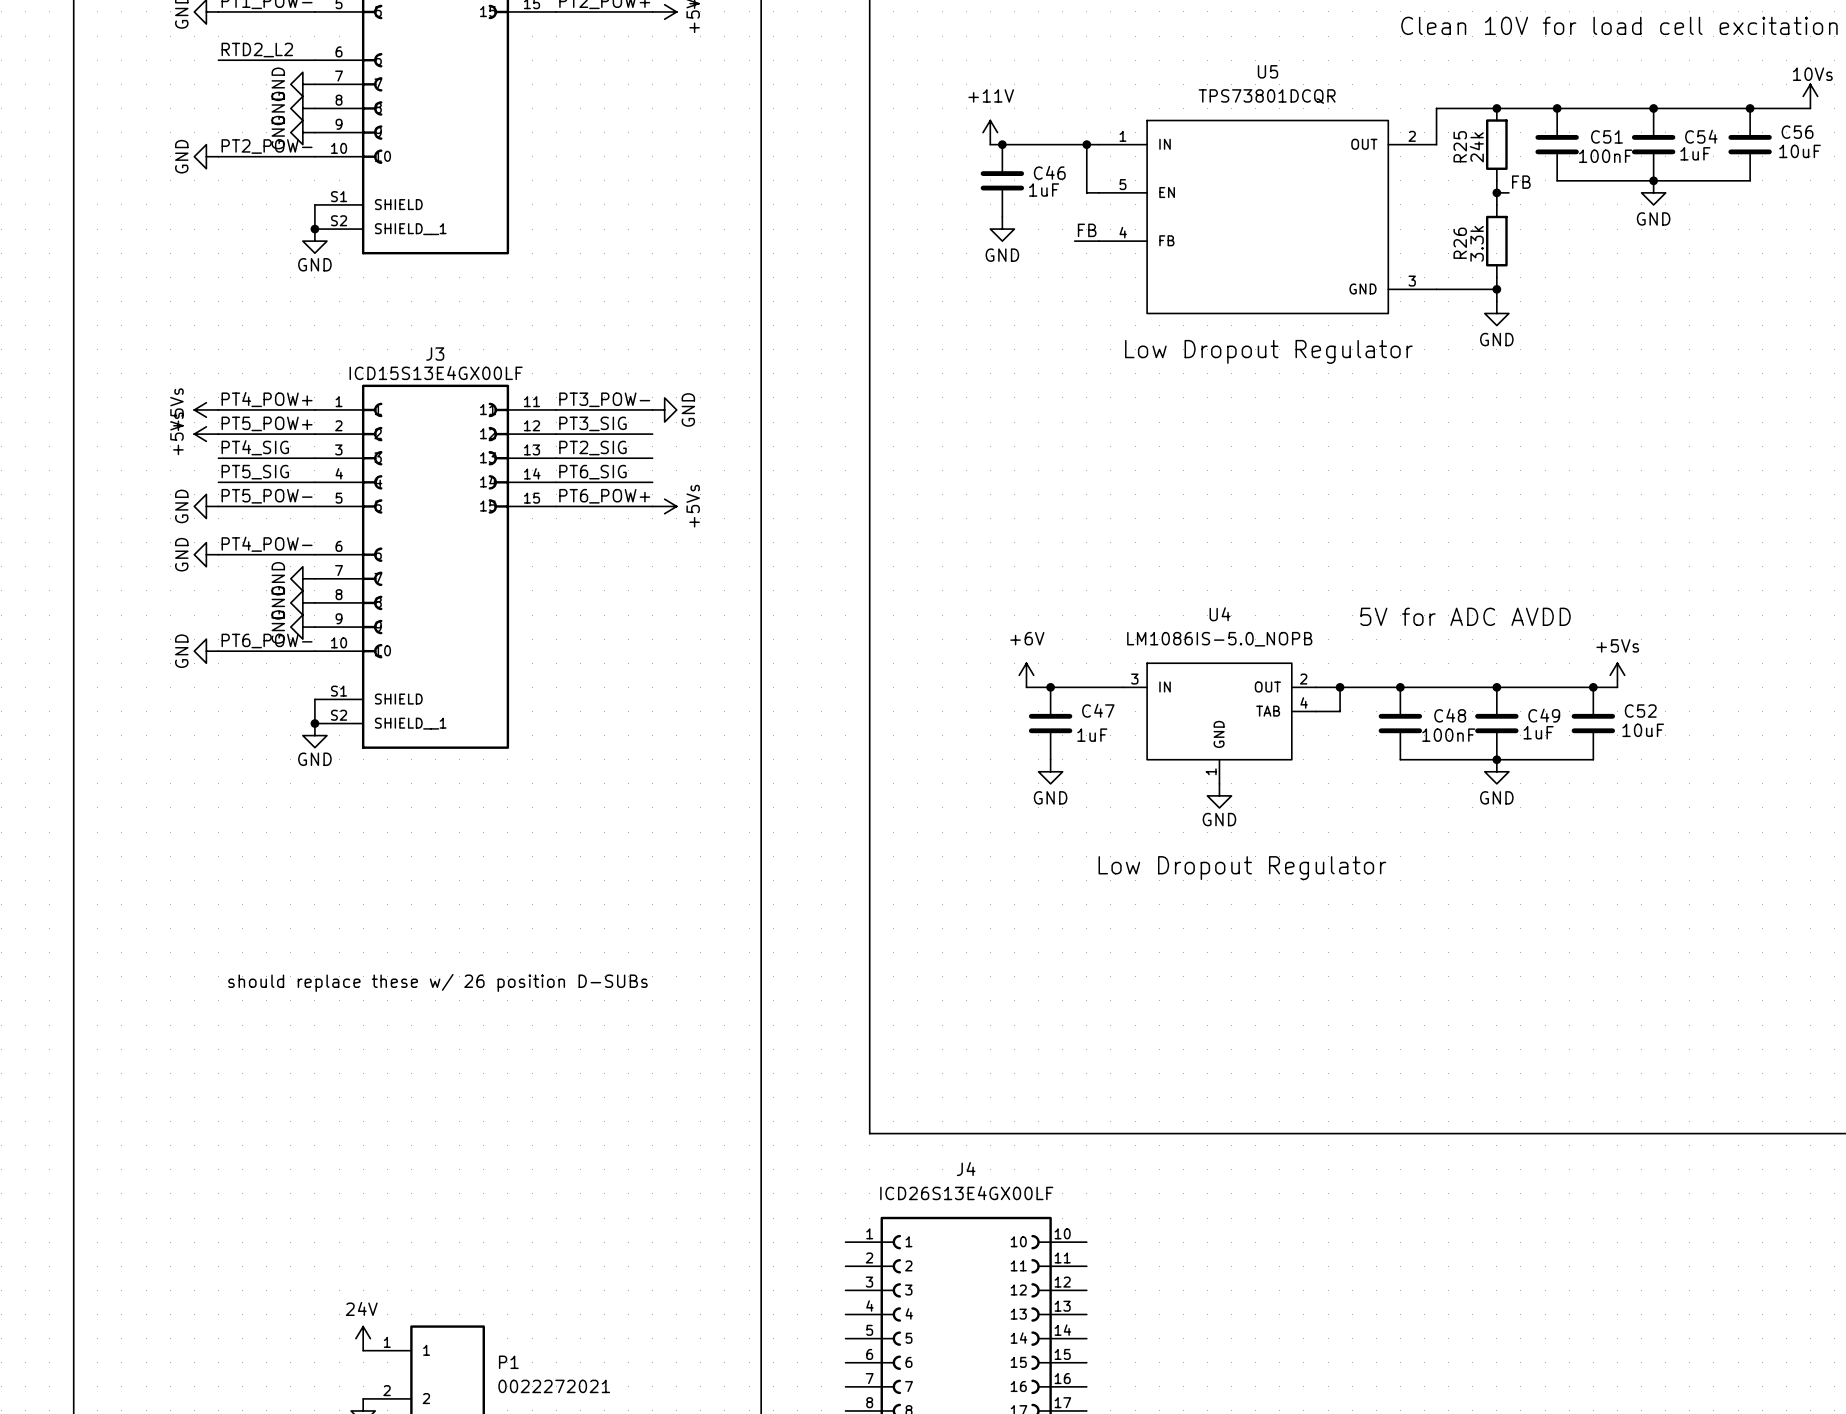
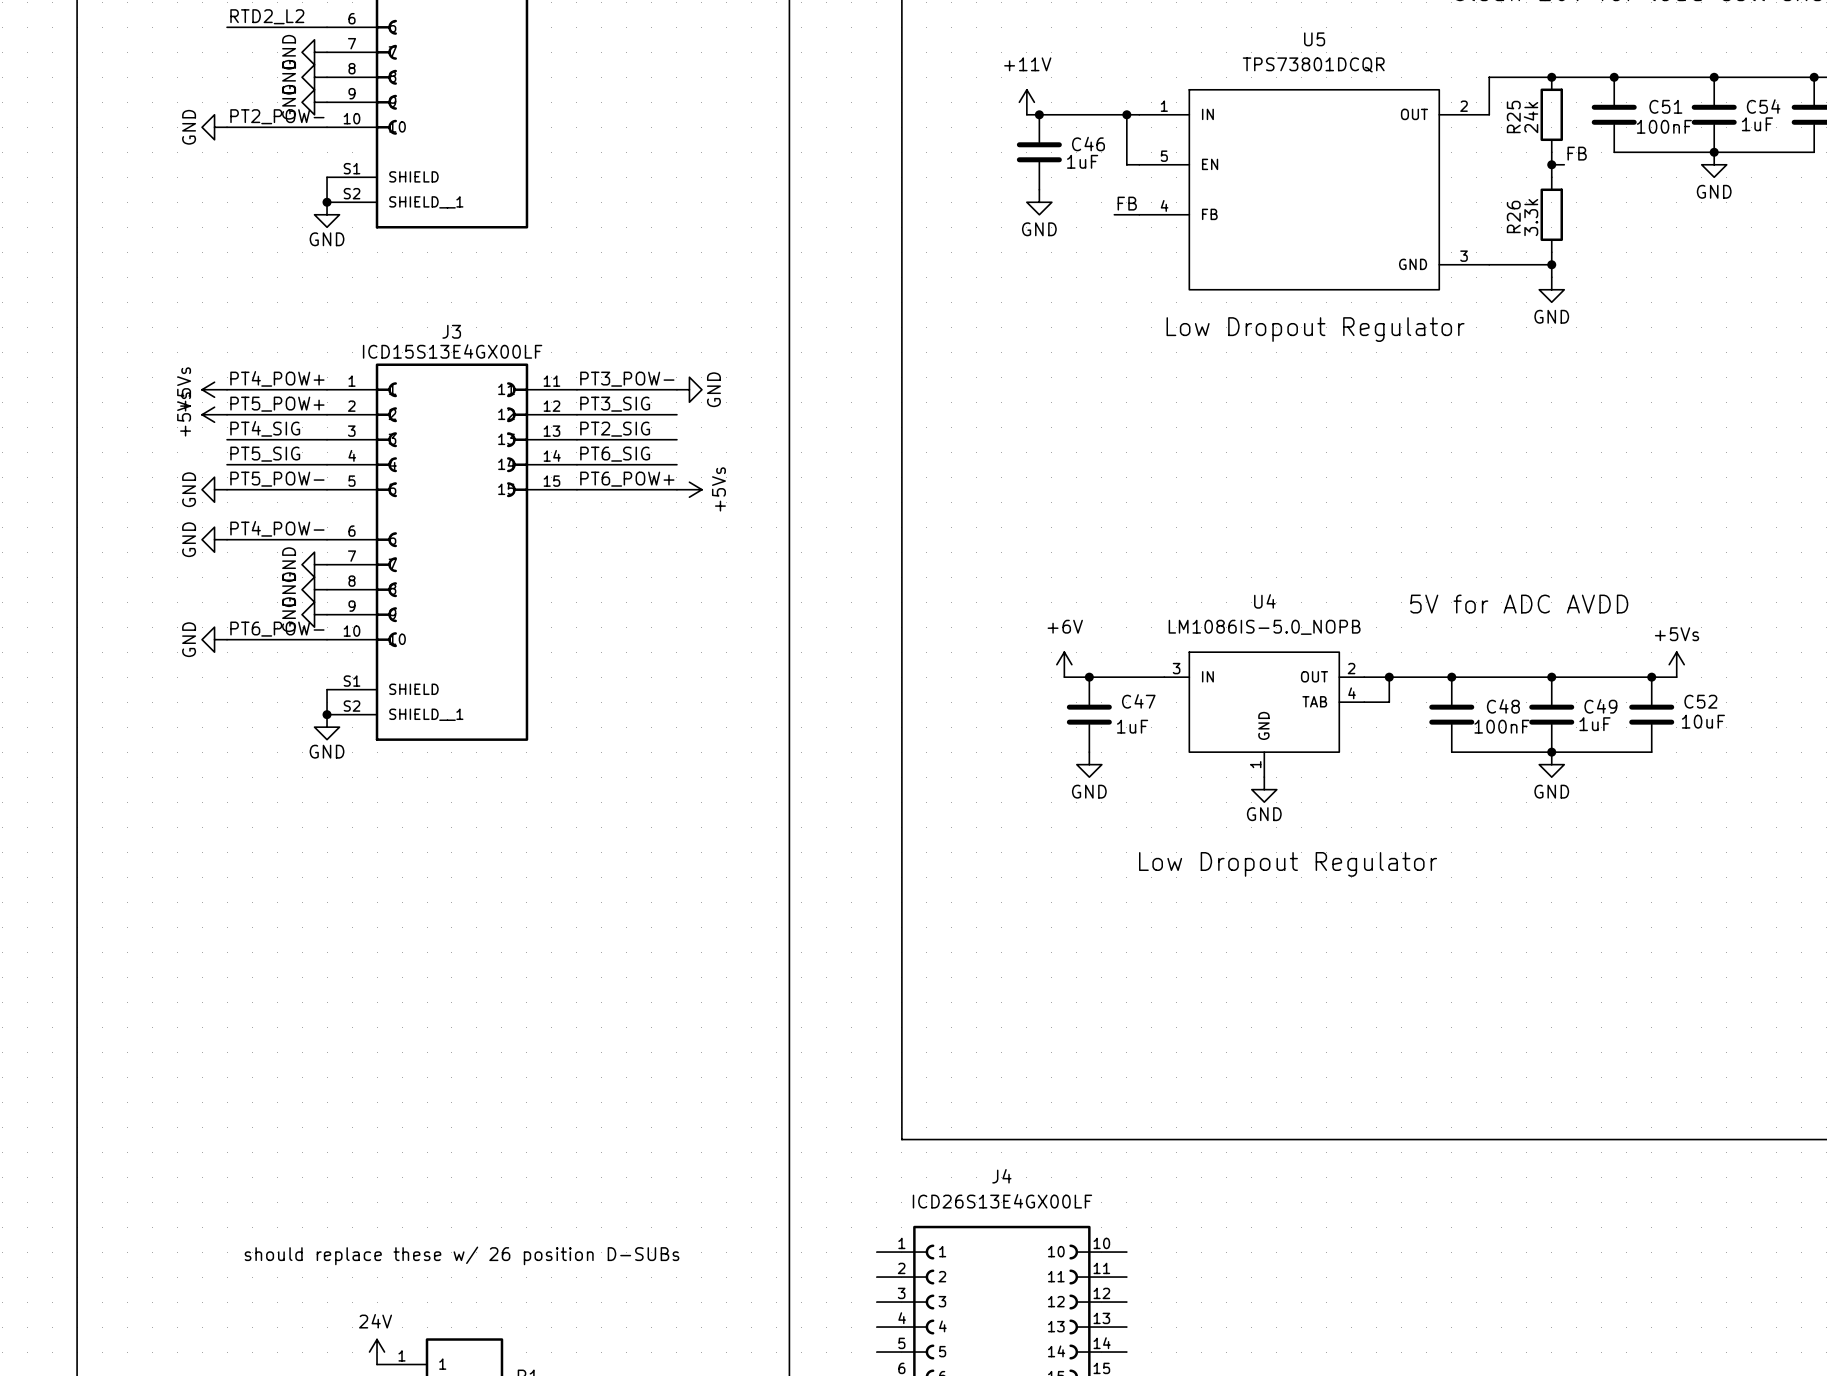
text: should replace these w/ 26 position D-SUBs (437, 982) -> none
text: none -> should replace these w/ 26 position D-SUBs (462, 1255)

